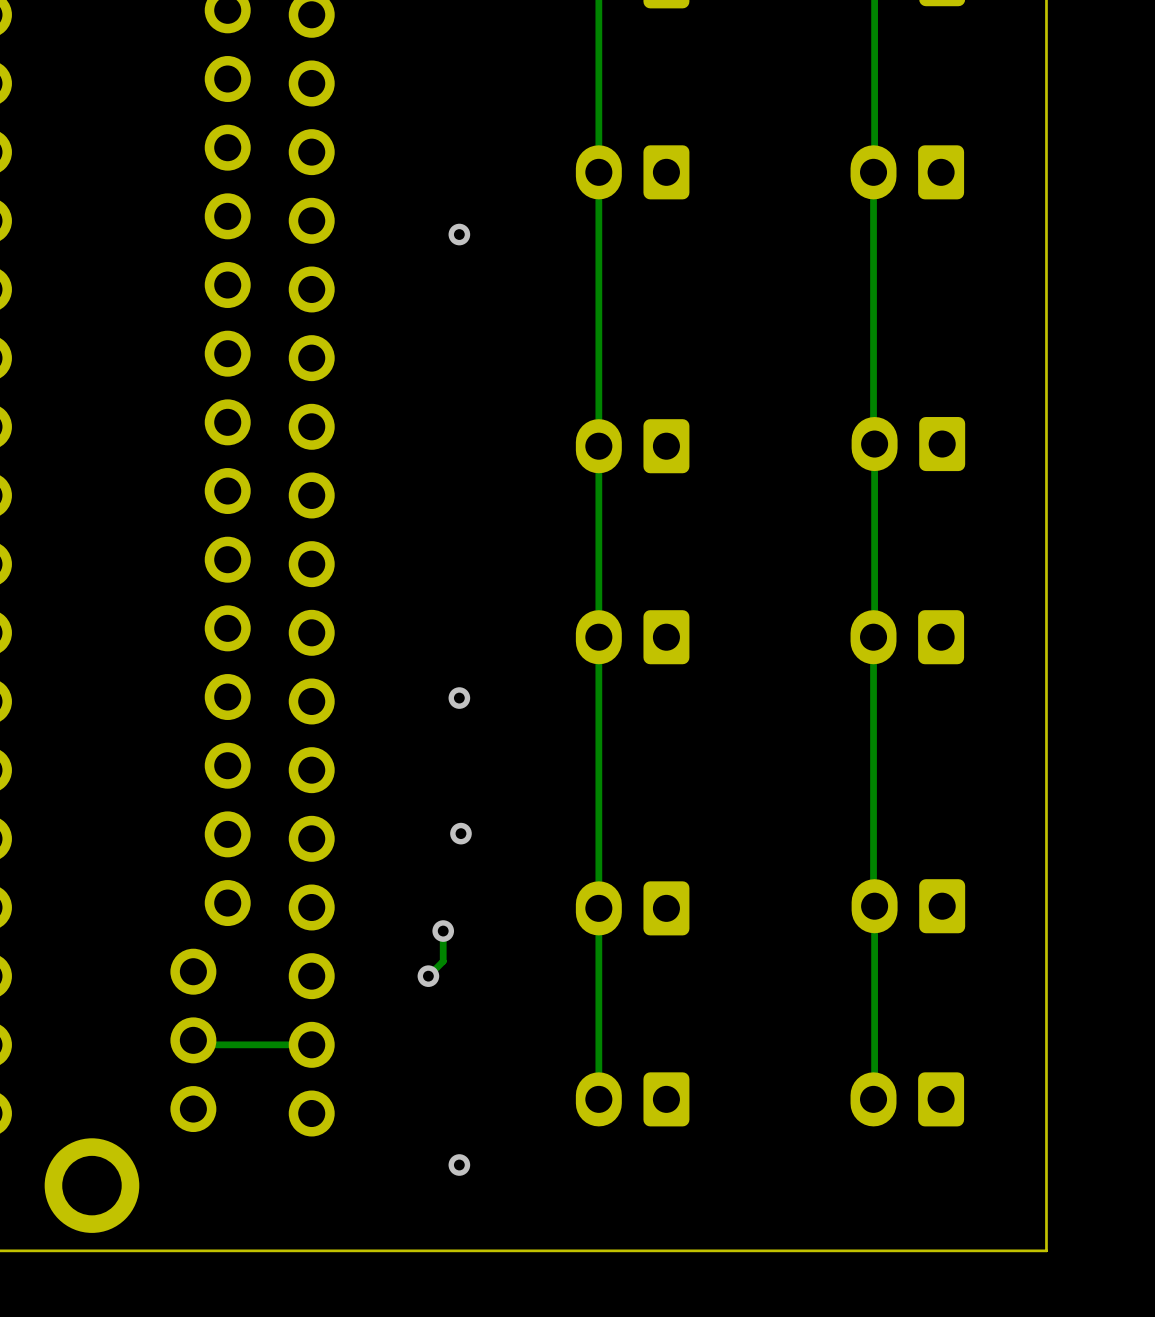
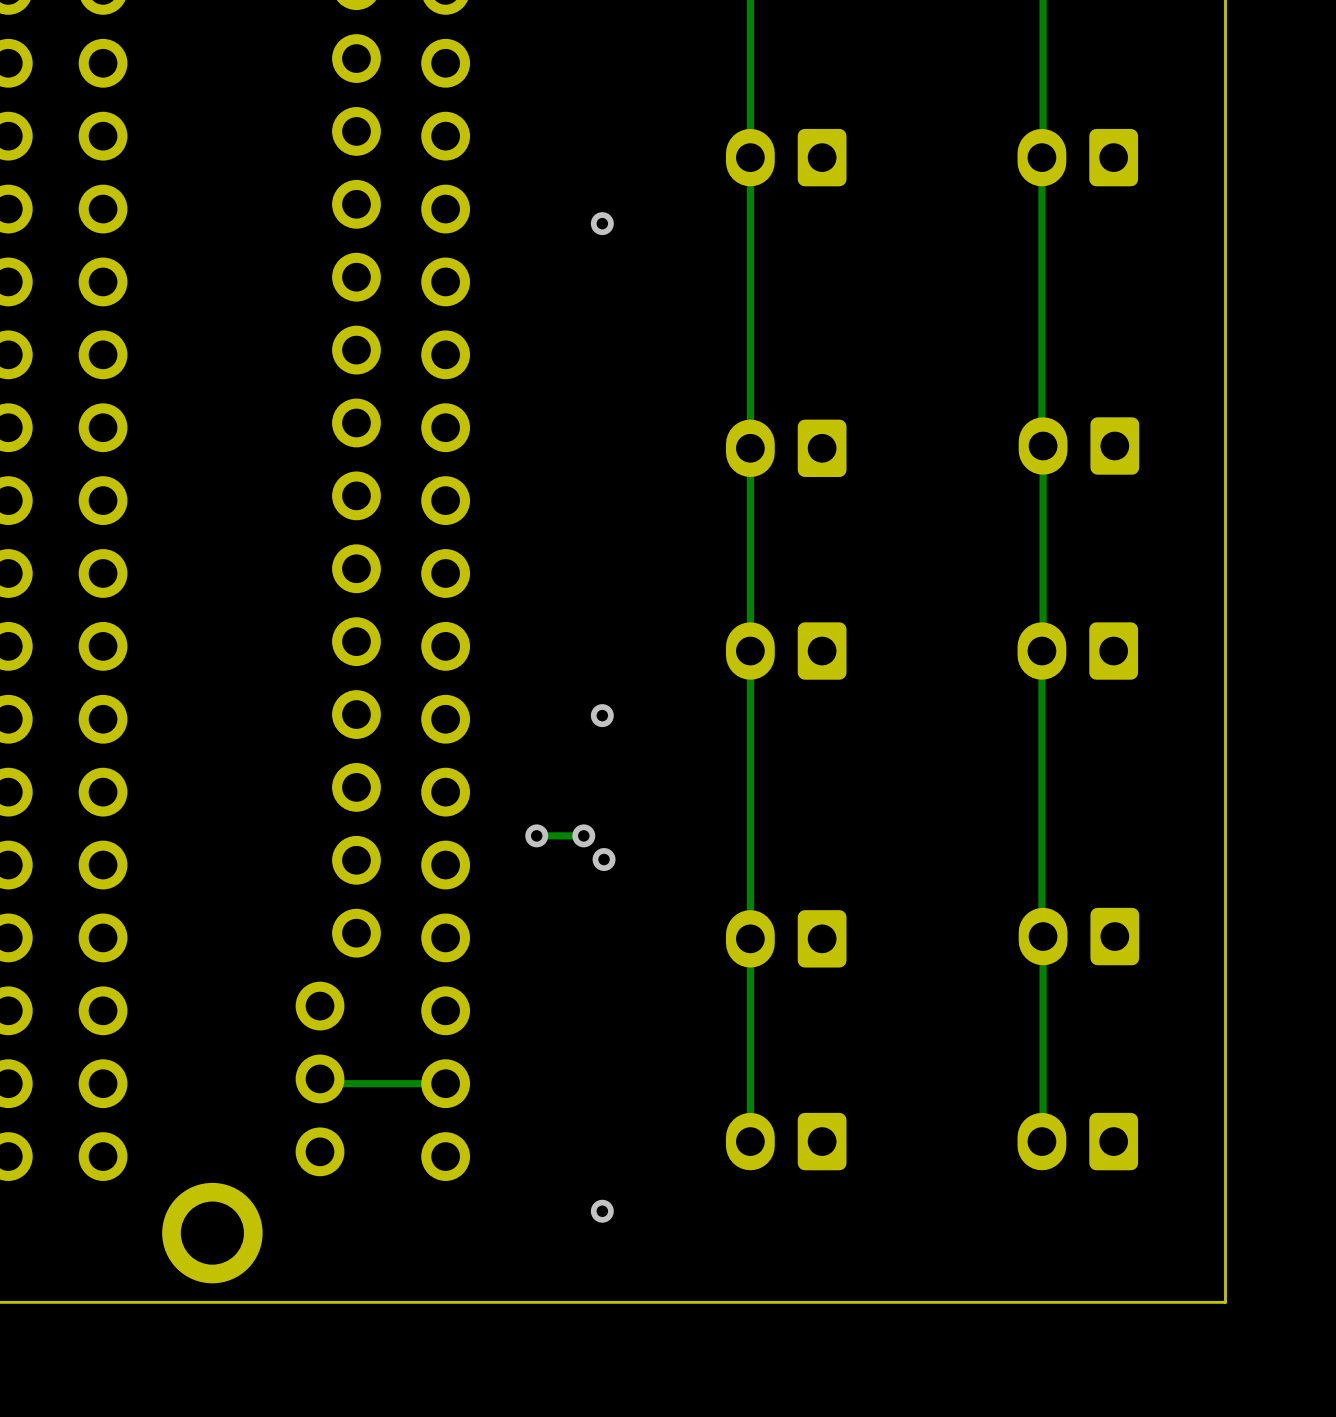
via: none -> (536, 835)
track: none -> (583, 835) (536, 835)
via: none -> (583, 835)
track: (443, 931) (443, 961) (428, 976) -> none
via: (443, 931) -> none
via: (428, 976) -> none

